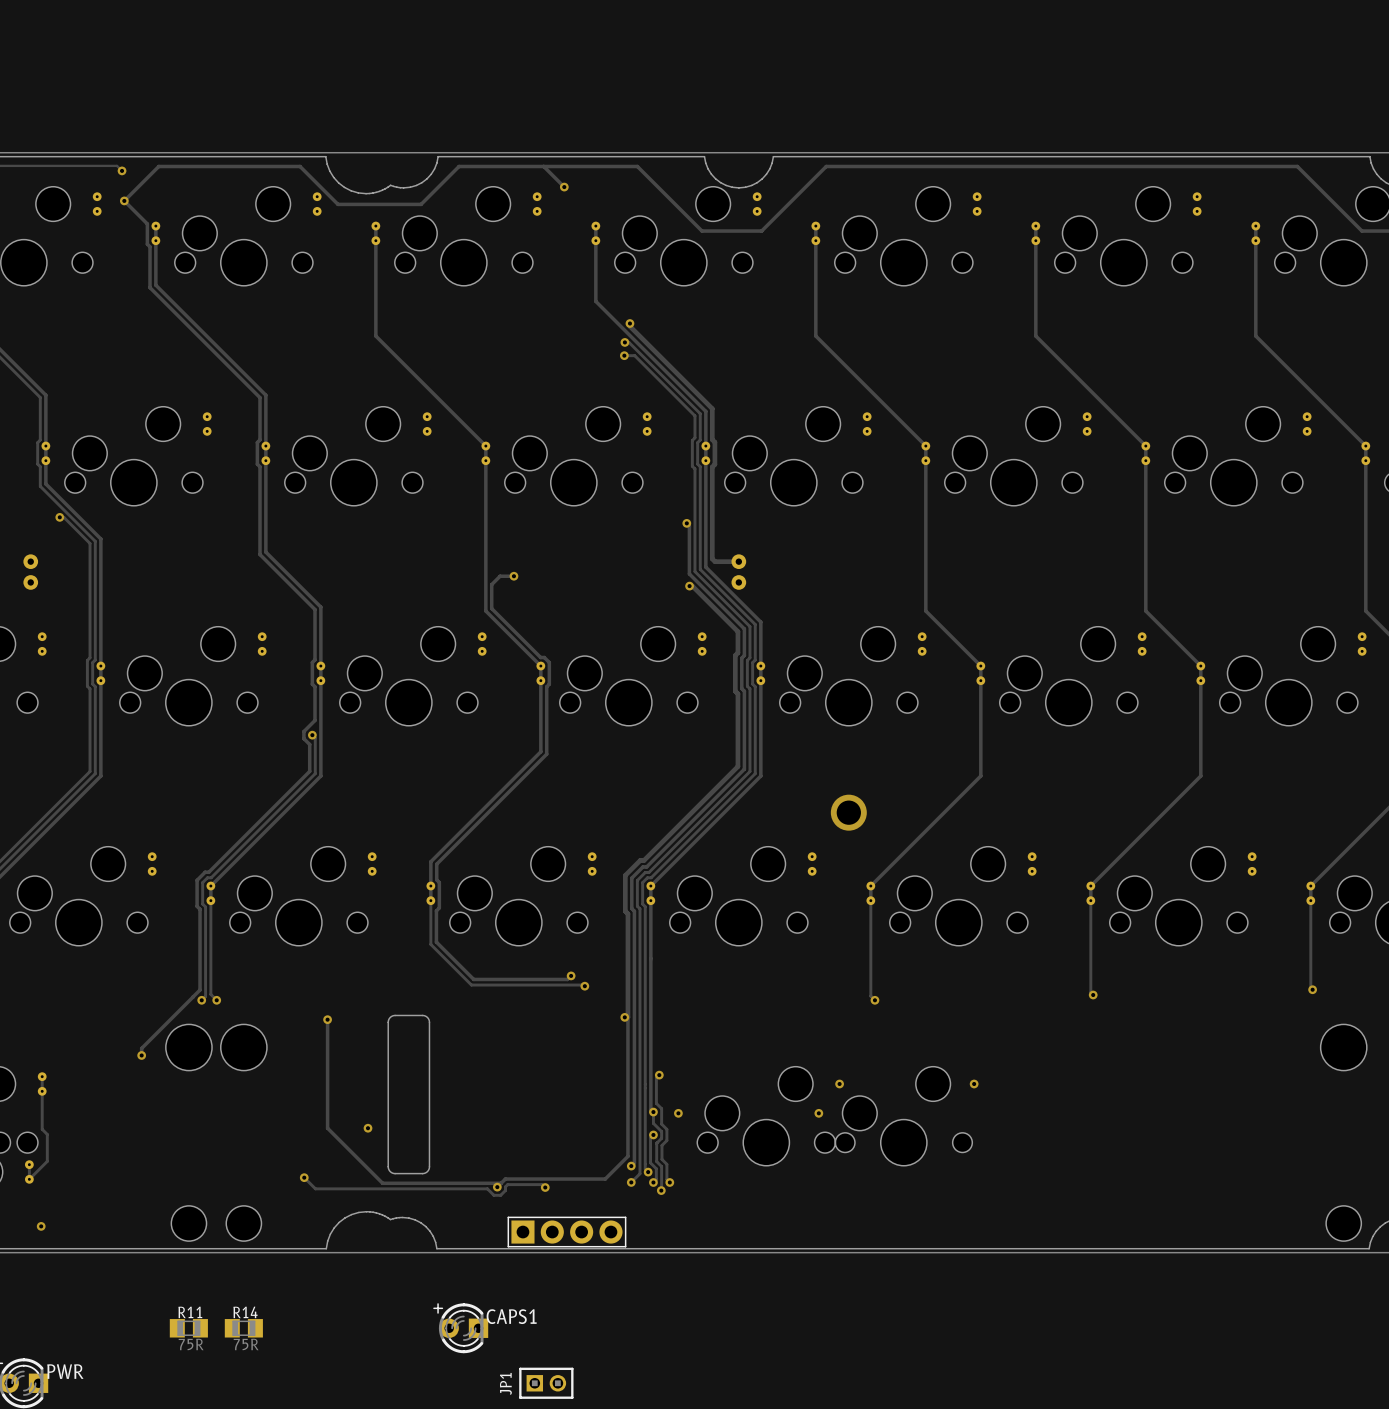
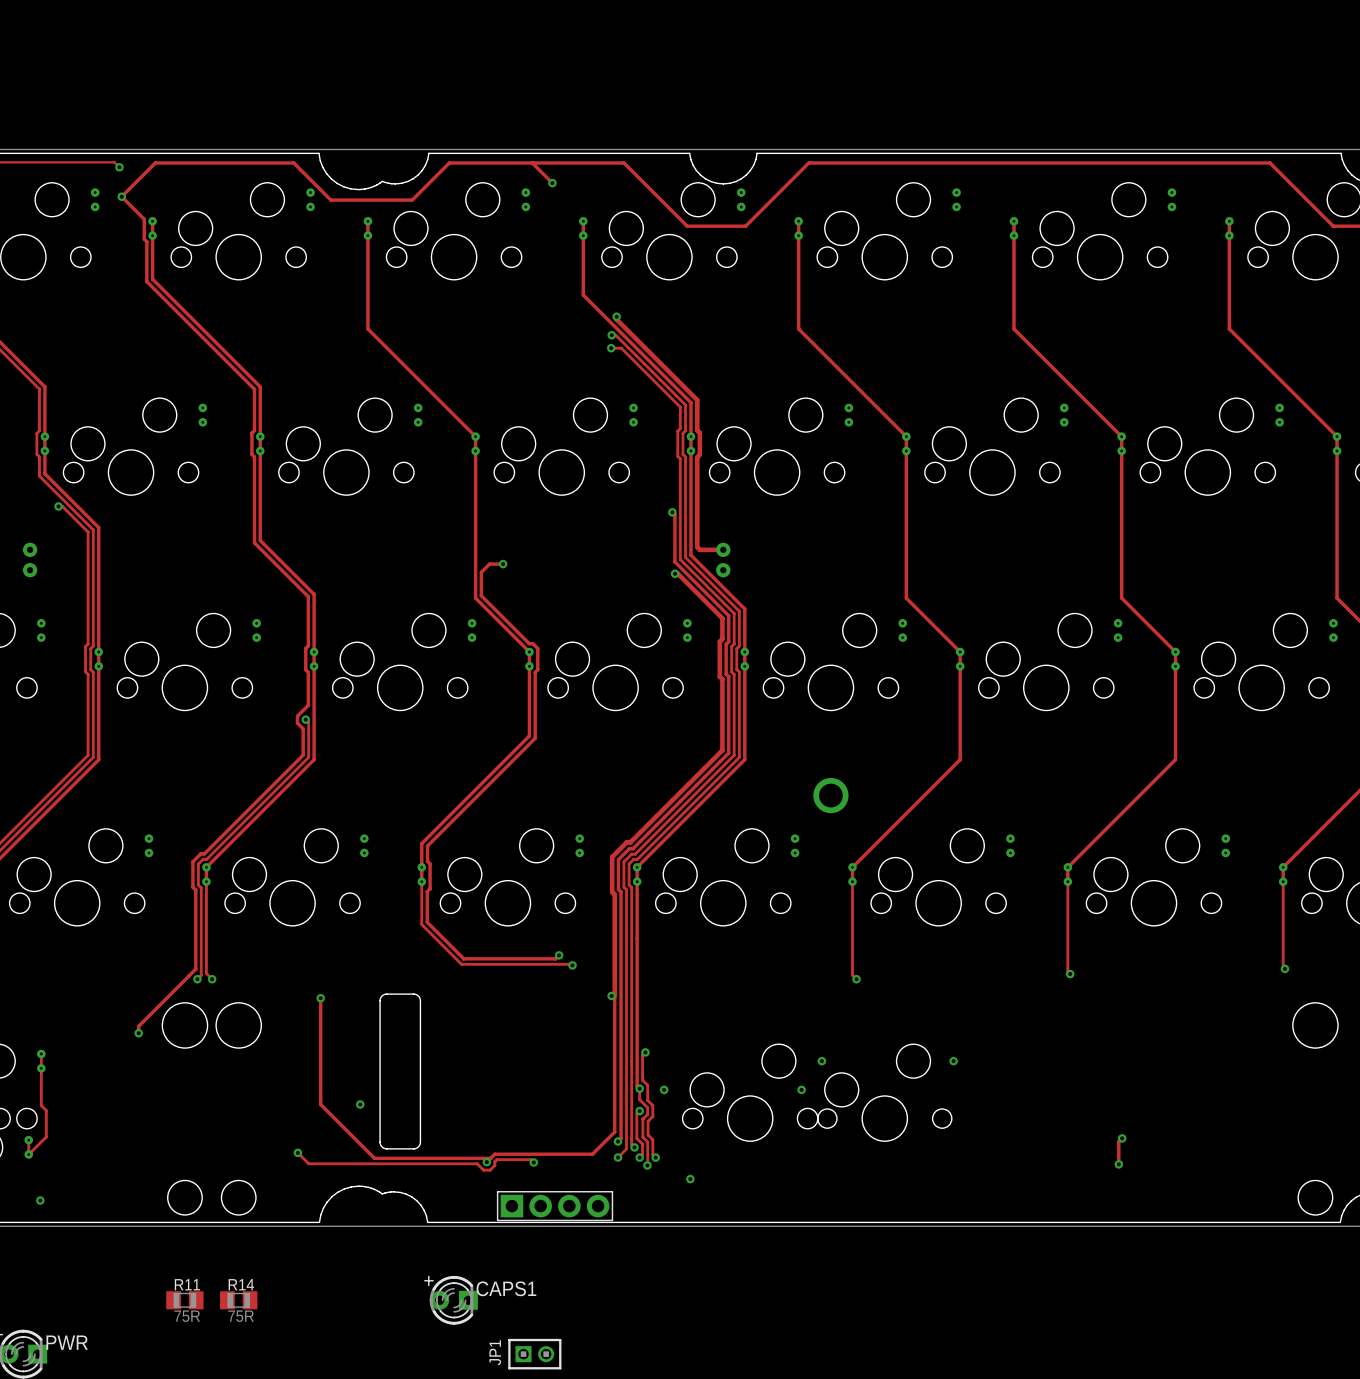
track: none -> (1122, 1138) (1118, 1141) (1118, 1164)
via: none -> (1122, 1138)
via: none -> (1118, 1164)
via: none -> (690, 1179)

